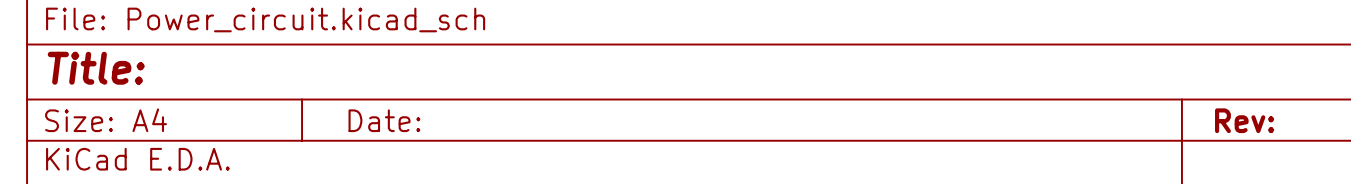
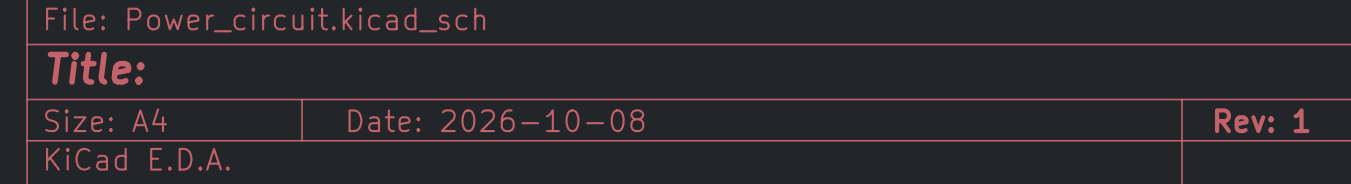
title block: Date: (384, 120) -> Date: 2026-10-08 (496, 120)
title block: Rev: (1244, 120) -> Rev: 1 (1262, 120)

